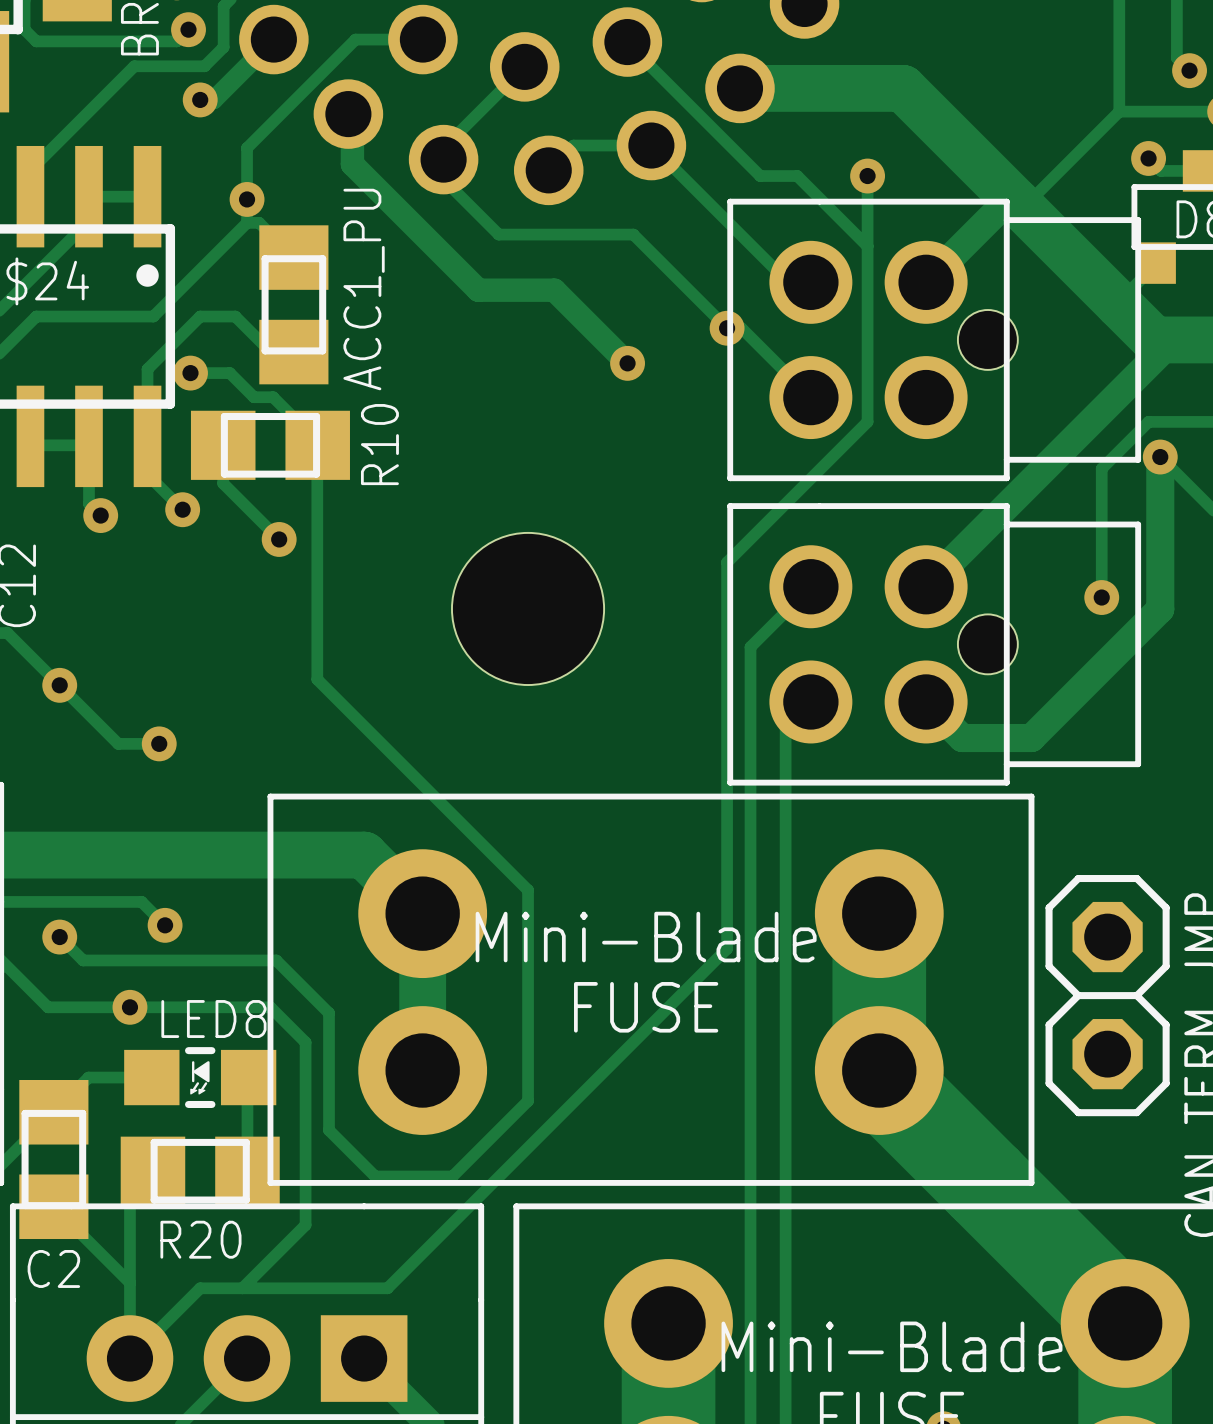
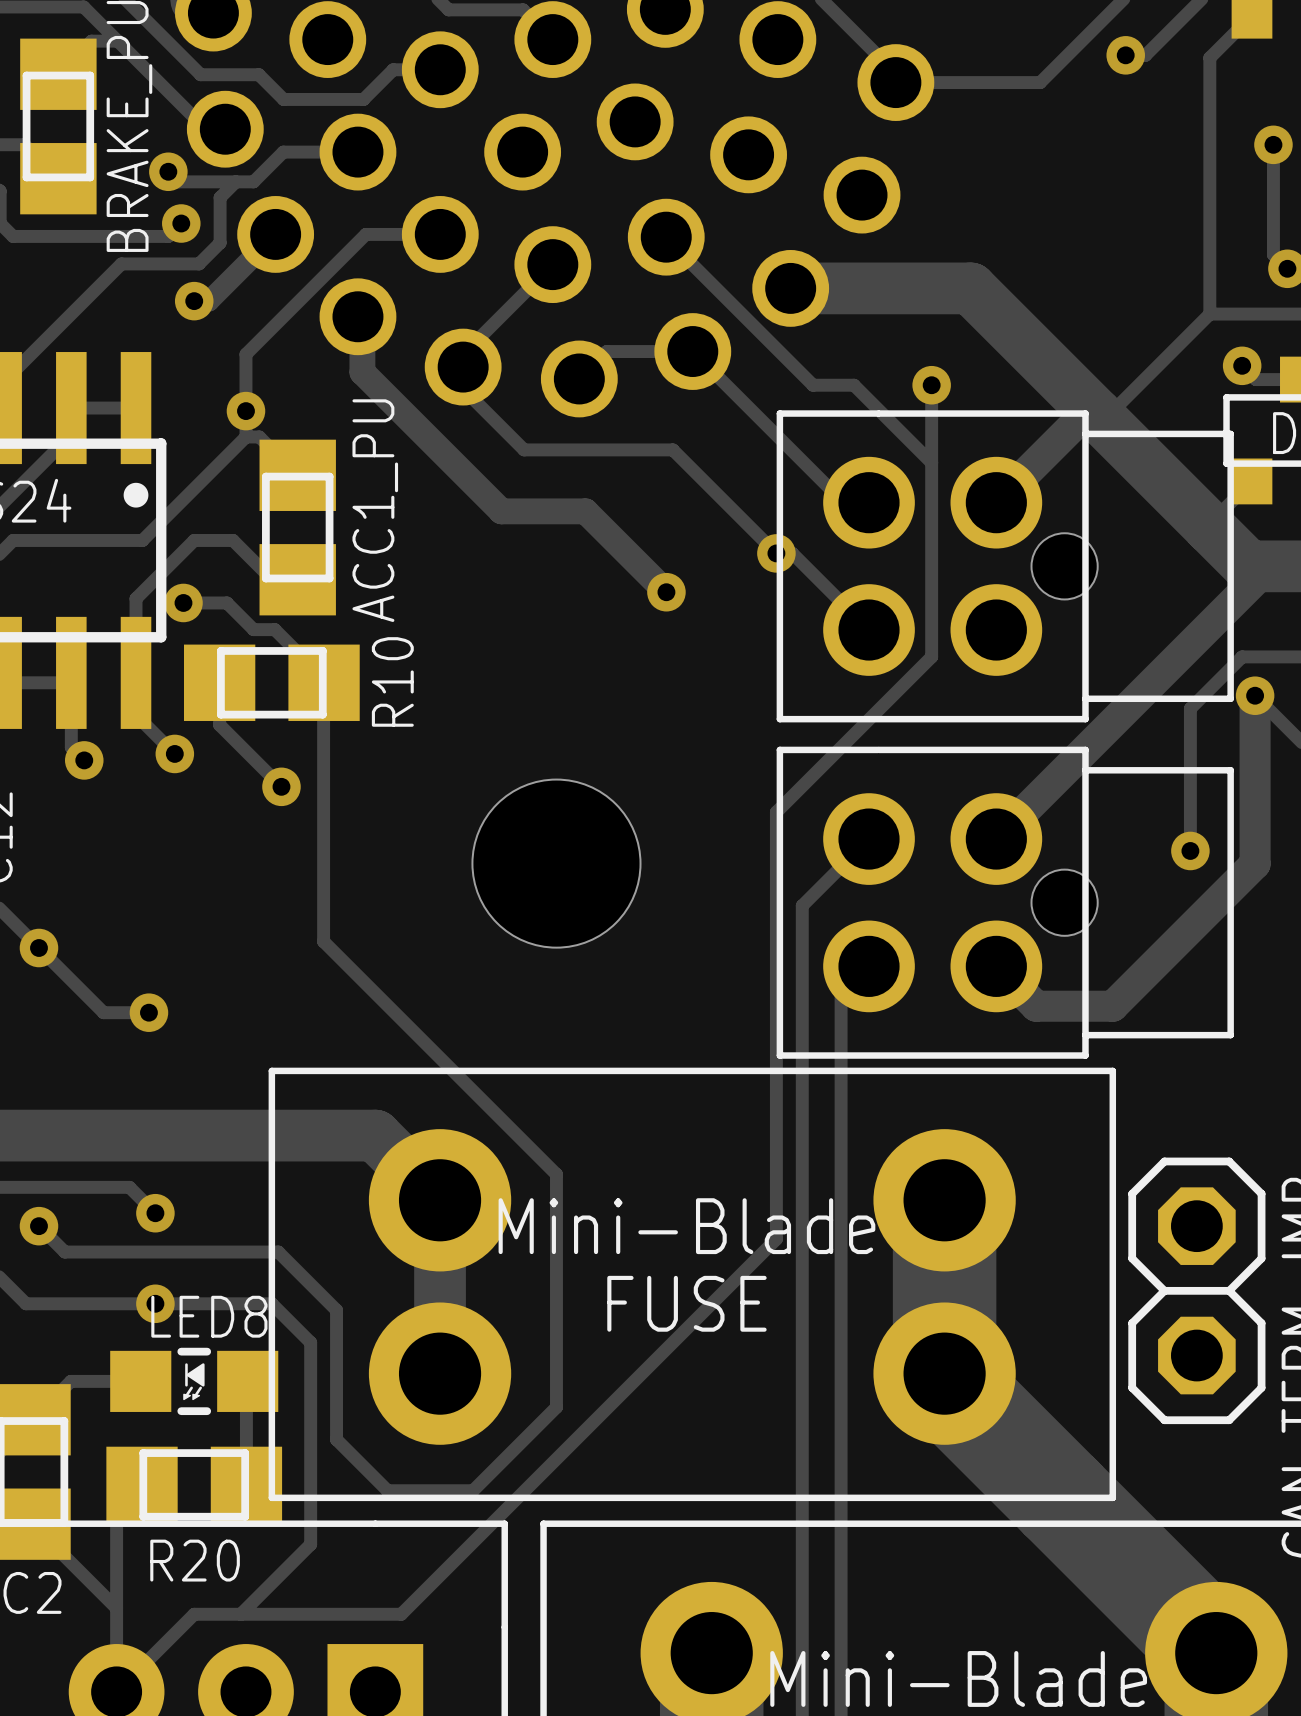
via position: (129, 1007) -> (155, 1303)

